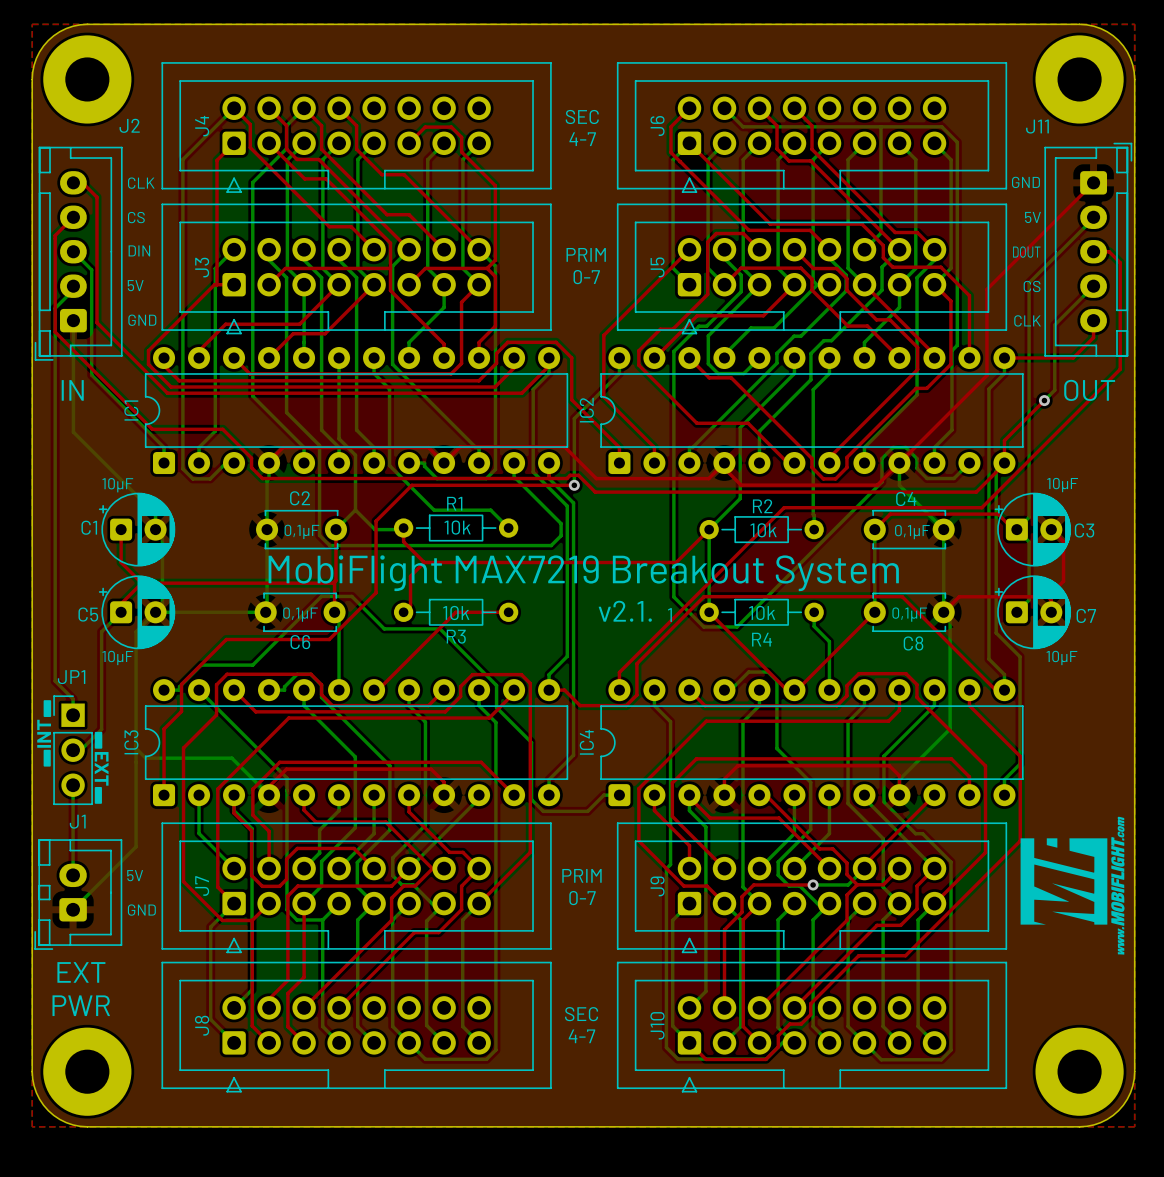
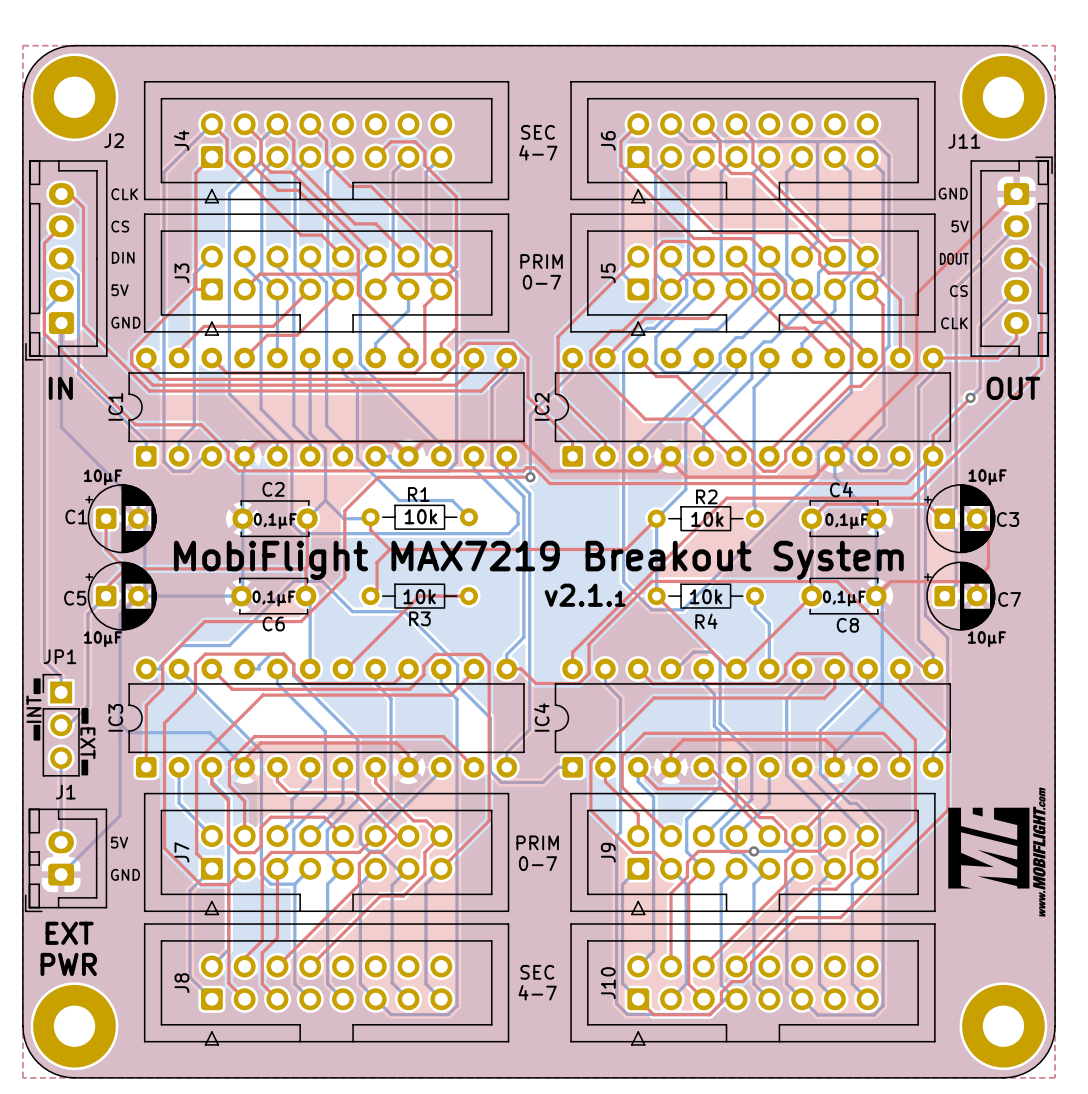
bottom track: (759, 705) (742, 722) (742, 887) -> (703, 683) (714, 694) (714, 726) (719, 731) (719, 786) (686, 819) (686, 851) (688, 853)

